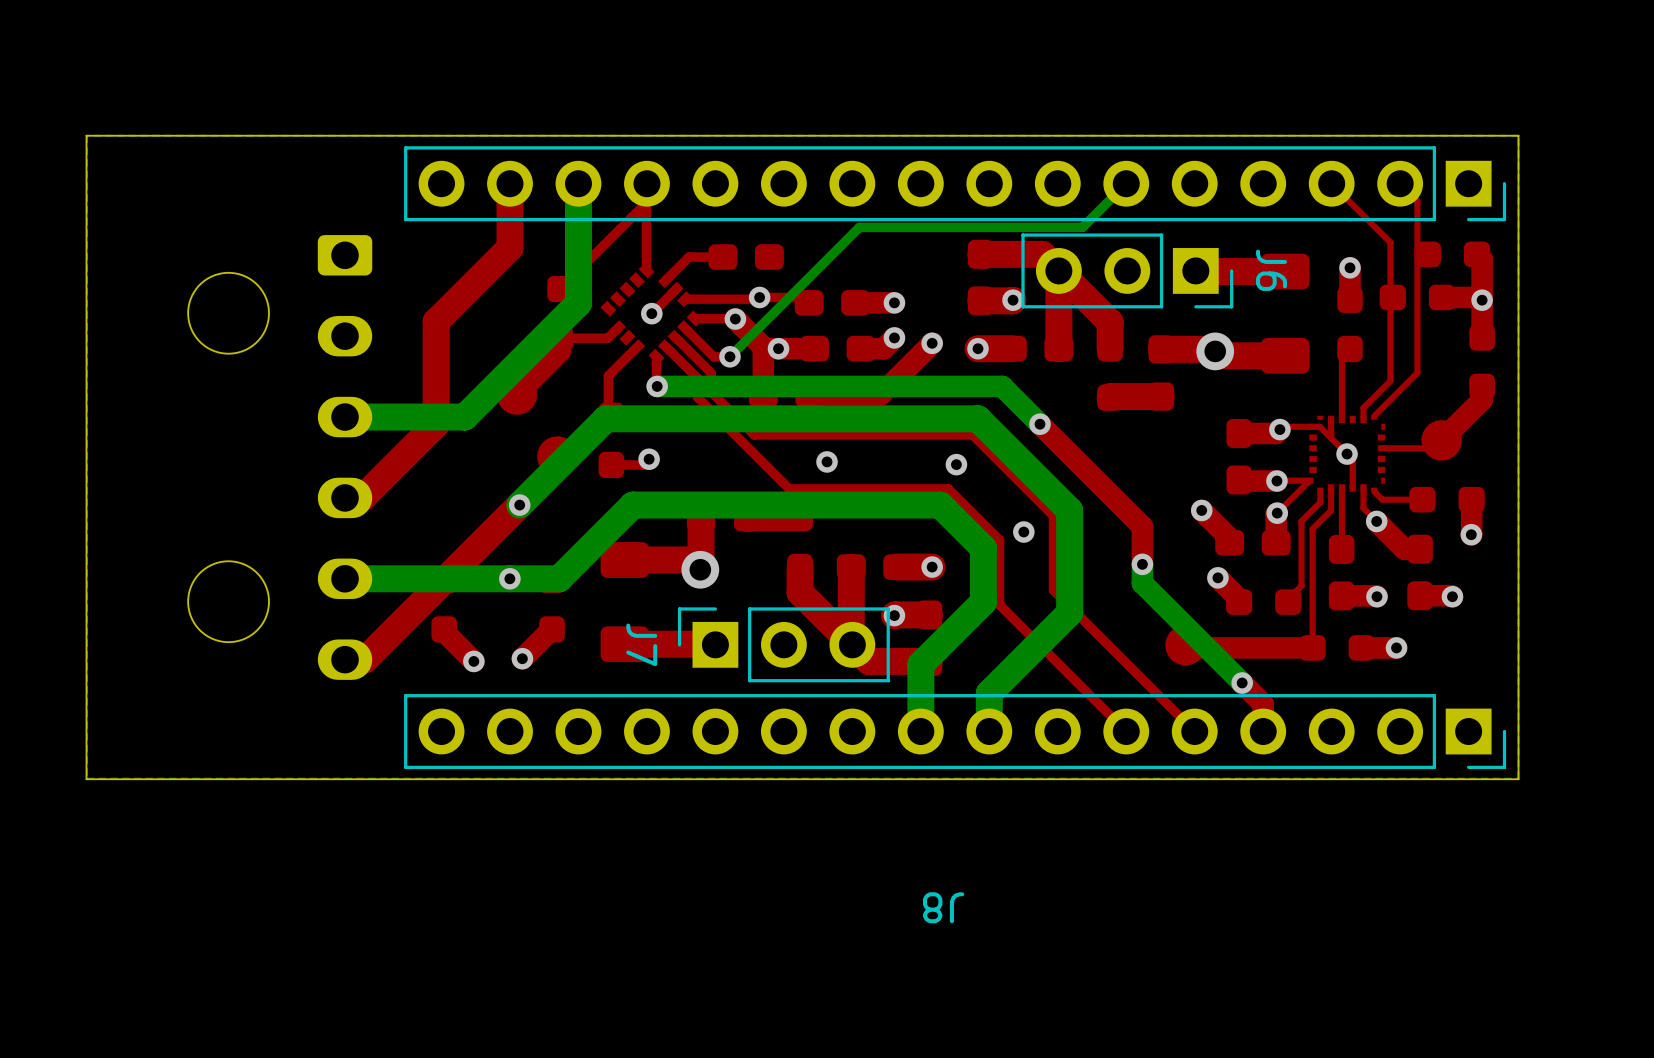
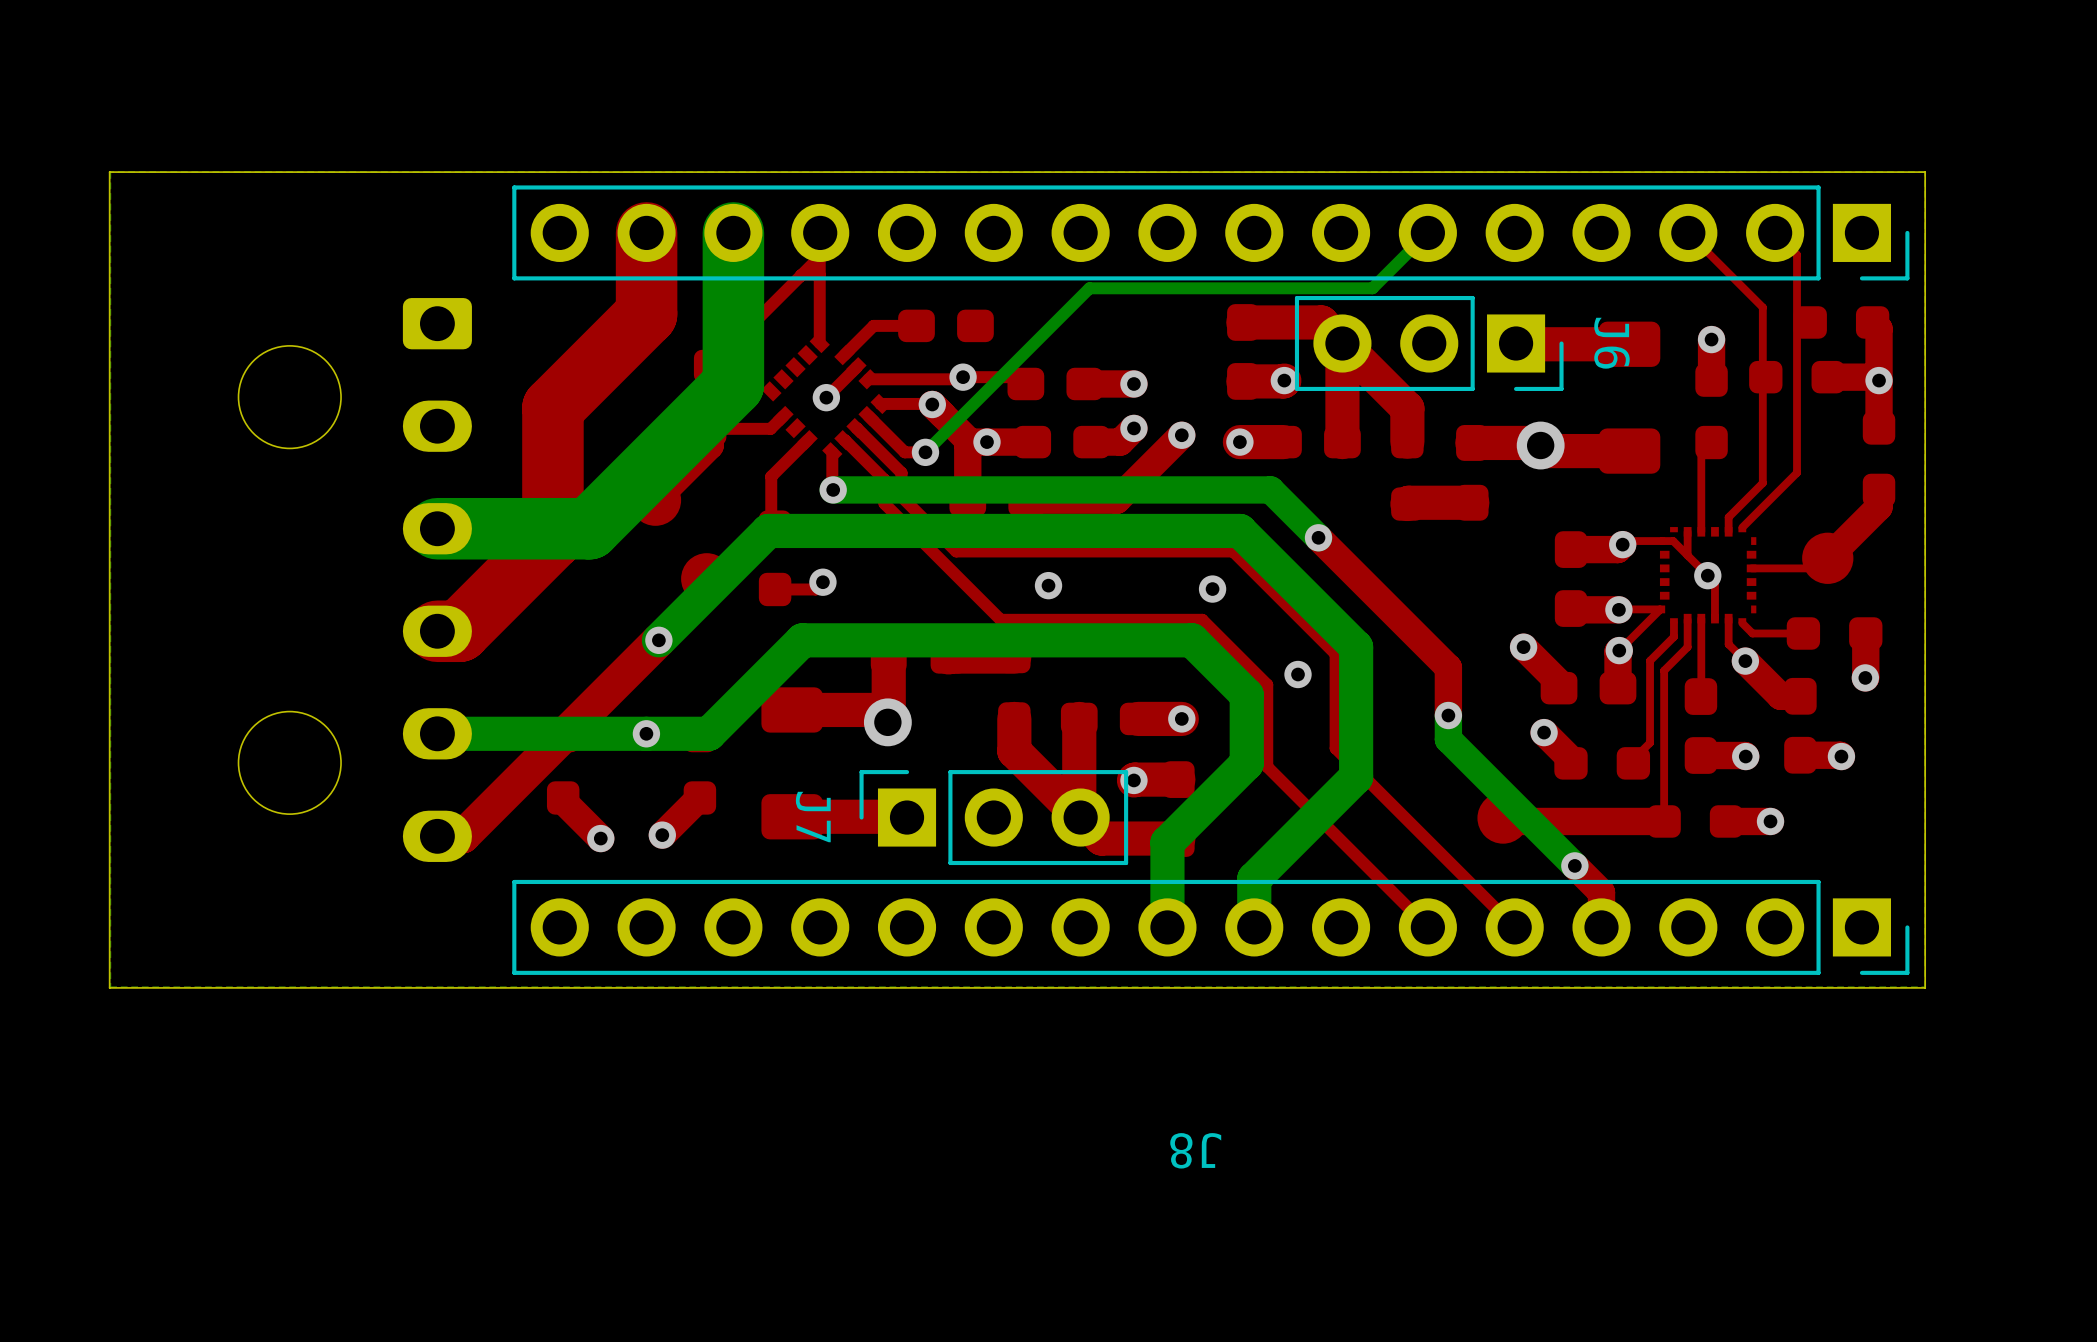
top track width: thin (510, 183) (510, 247) (436, 321) (436, 424) (362, 497) (345, 497) -> thick (646, 232) (646, 314) (552, 407) (552, 537) (459, 631) (437, 631)
bottom track width: thin (578, 183) (578, 303) (464, 417) (345, 417) -> thick (733, 232) (733, 384) (589, 528) (437, 528)

